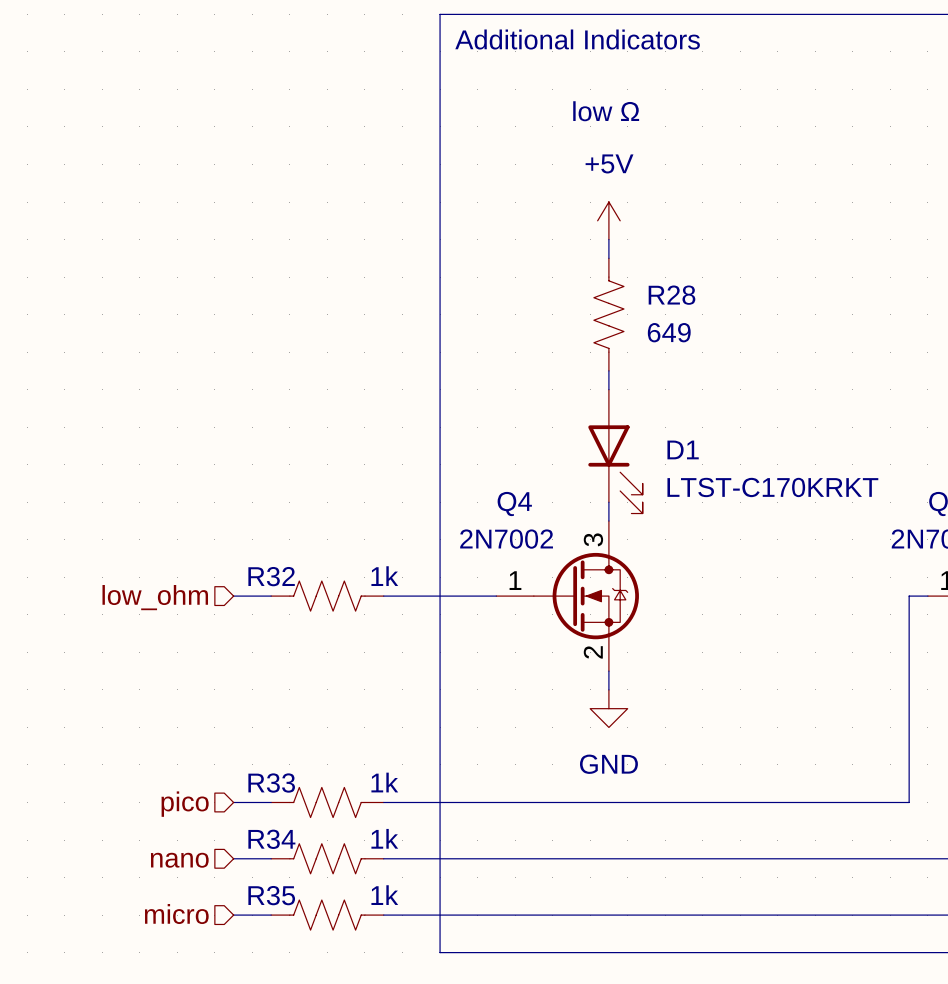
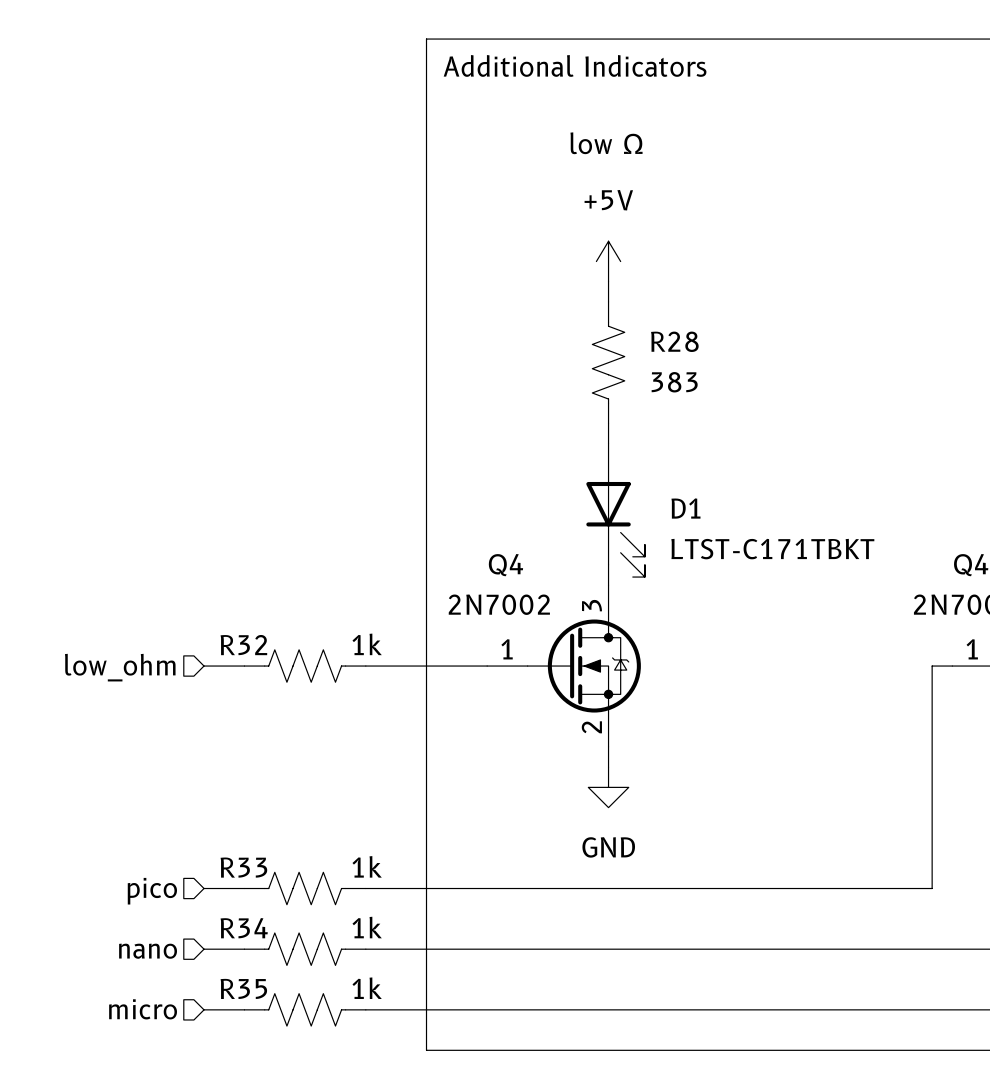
R28 value: 649 (669, 332) -> 383 (674, 382)
D1 value: LTST-C170KRKT (772, 487) -> LTST-C171TBKT (772, 549)

